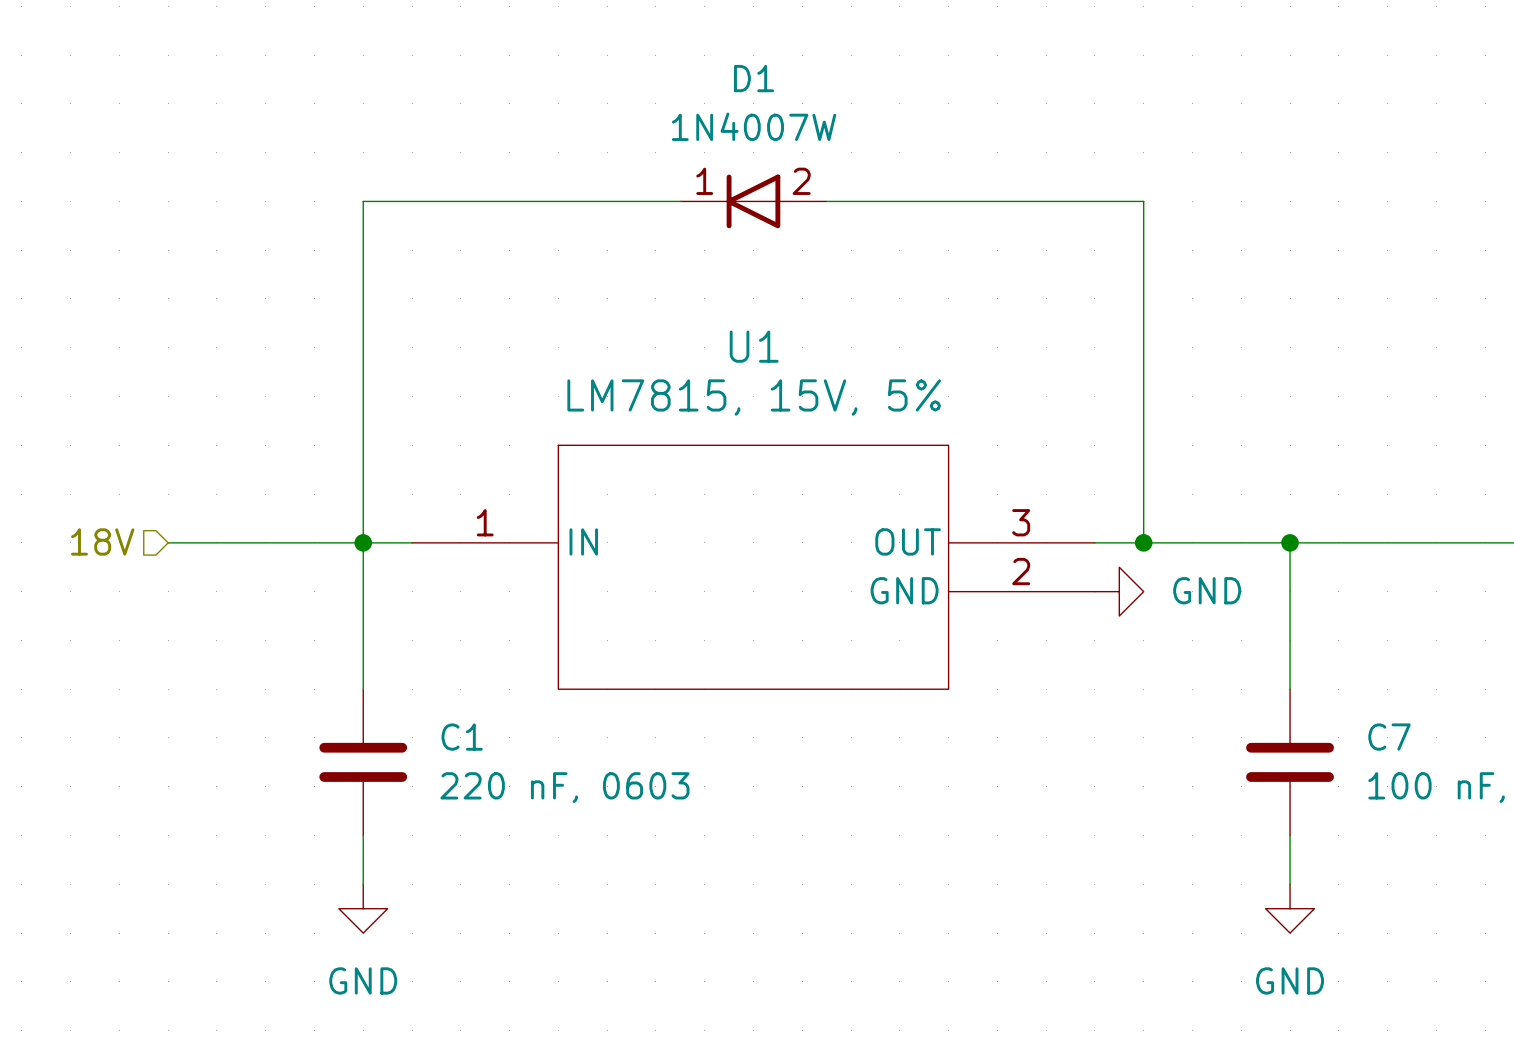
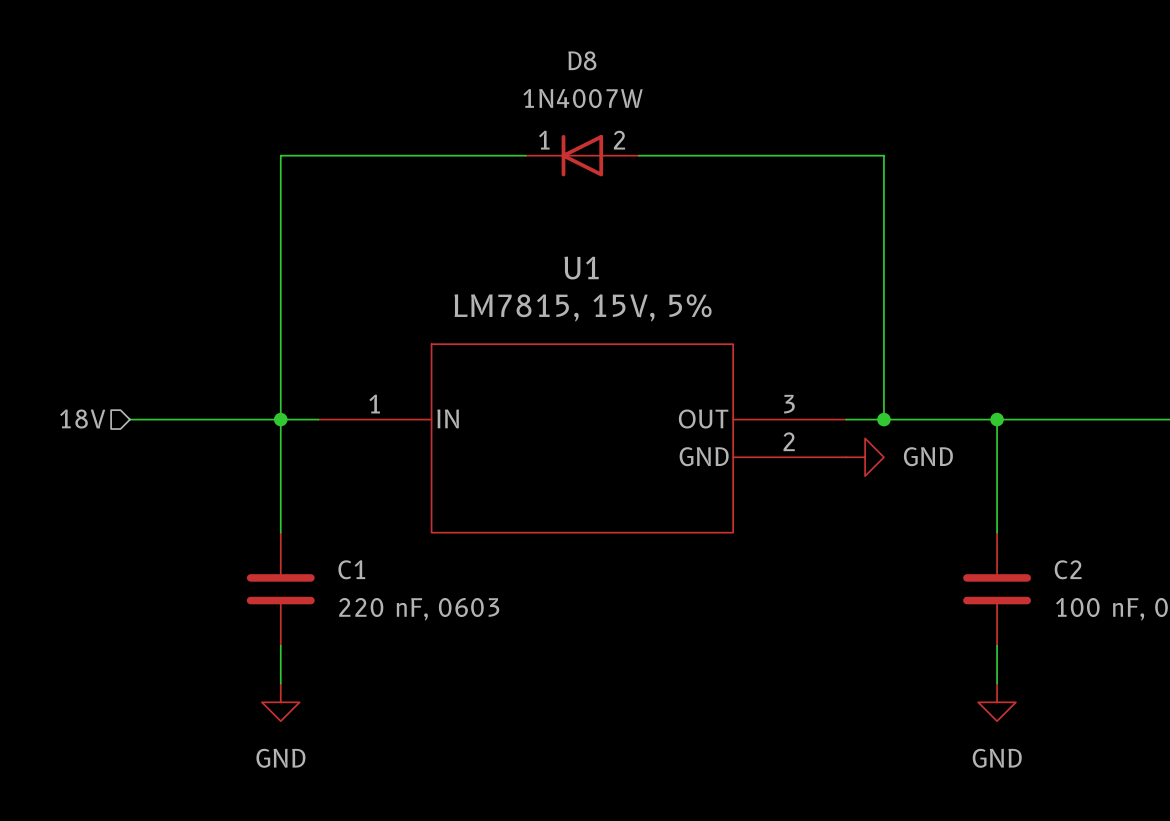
D1 name: D1 (754, 78) -> D8 (582, 60)
C7 name: C7 (1389, 737) -> C2 (1068, 569)

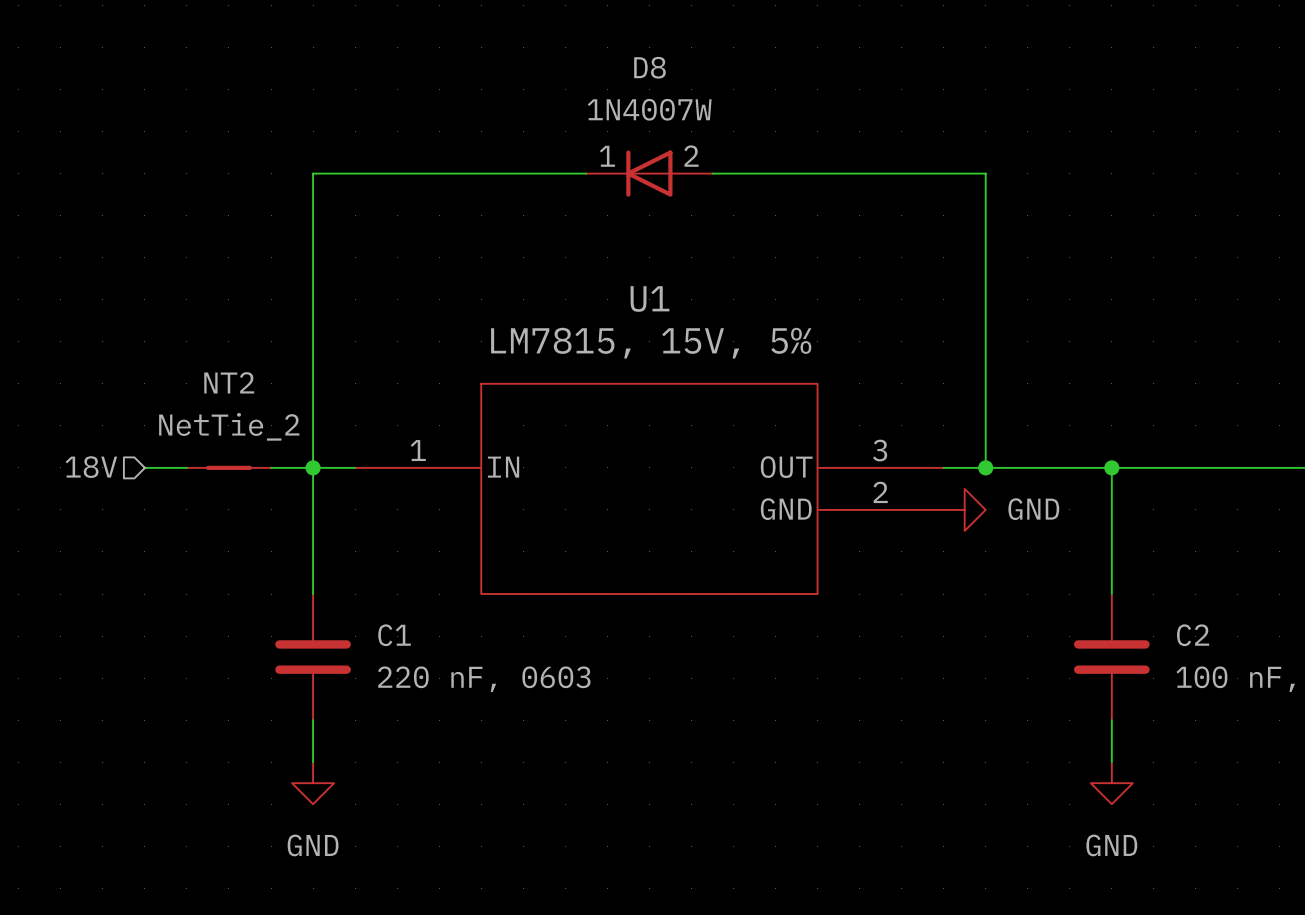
NT2: none -> NetTie_2 (228, 467)

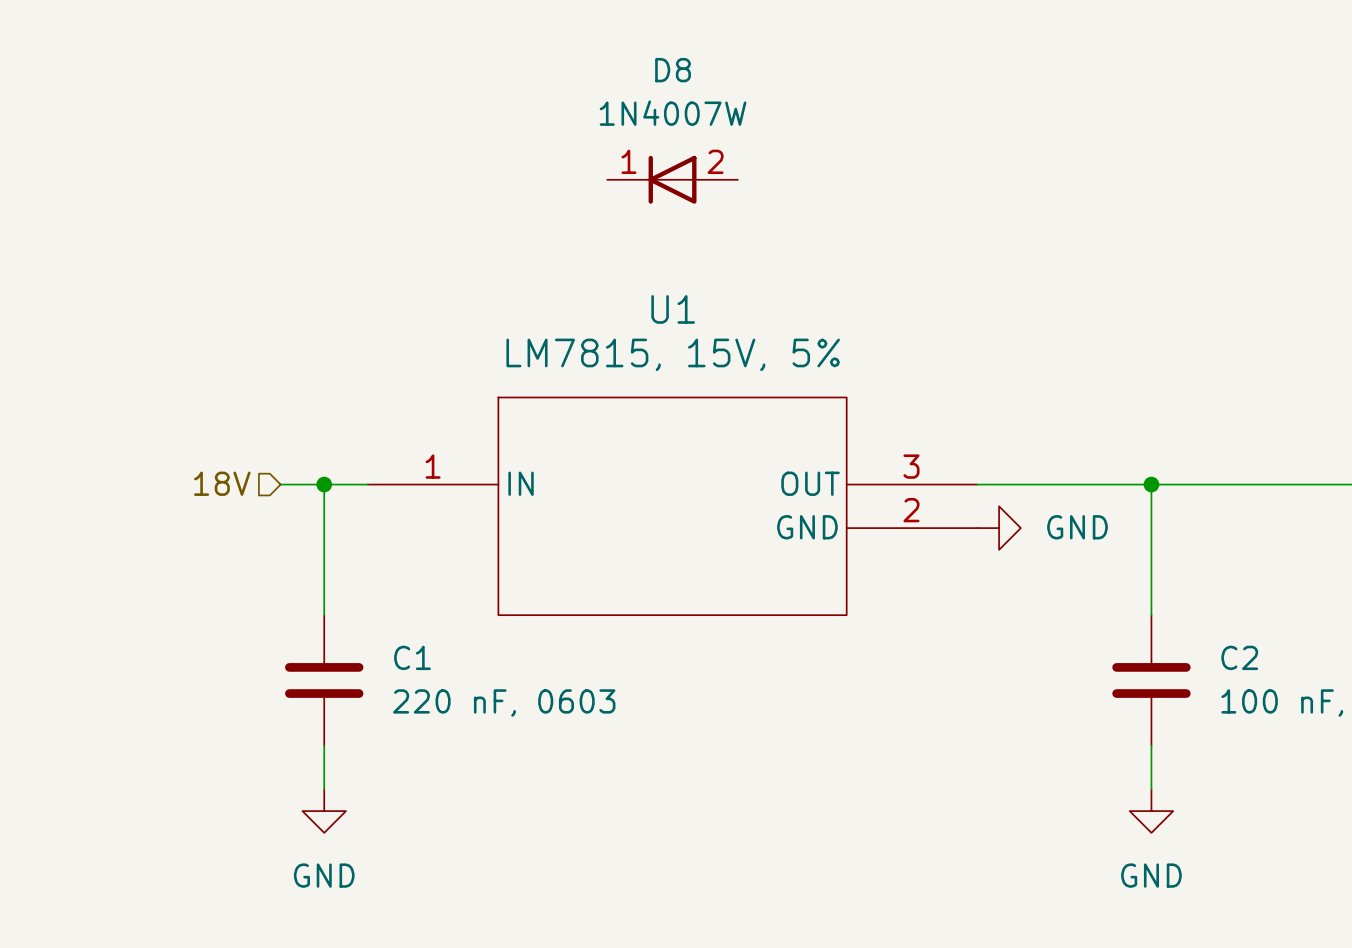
wire: (586, 173) (313, 173) (313, 467) -> none
wire: (712, 173) (985, 173) (985, 467) -> none
hierarchical label position: 18V (91, 467) -> 18V (222, 483)
wire: (144, 467) (186, 467) -> none
NT2: NetTie_2 (228, 467) -> none
junction: (985, 467) -> none

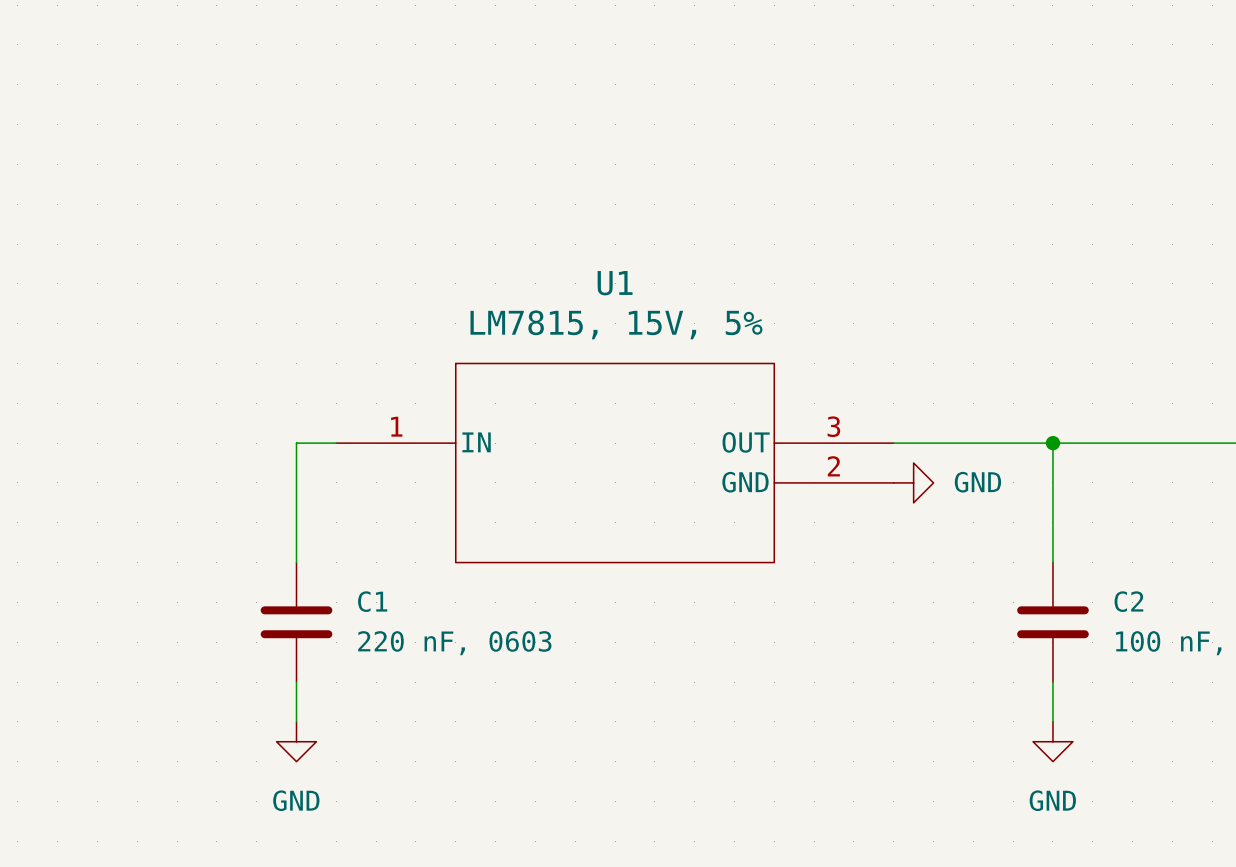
D8: 1N4007W (672, 179) -> none
hierarchical label: 18V (222, 483) -> none
wire: (280, 484) (324, 484) -> none
junction: (324, 484) -> none

